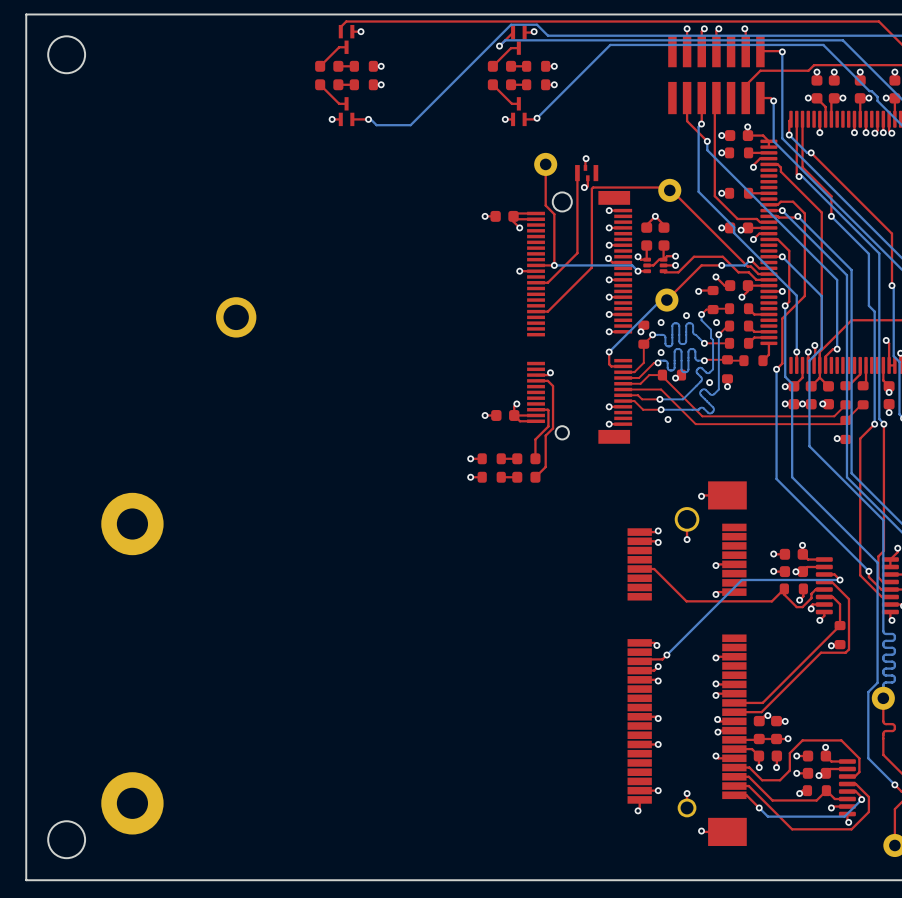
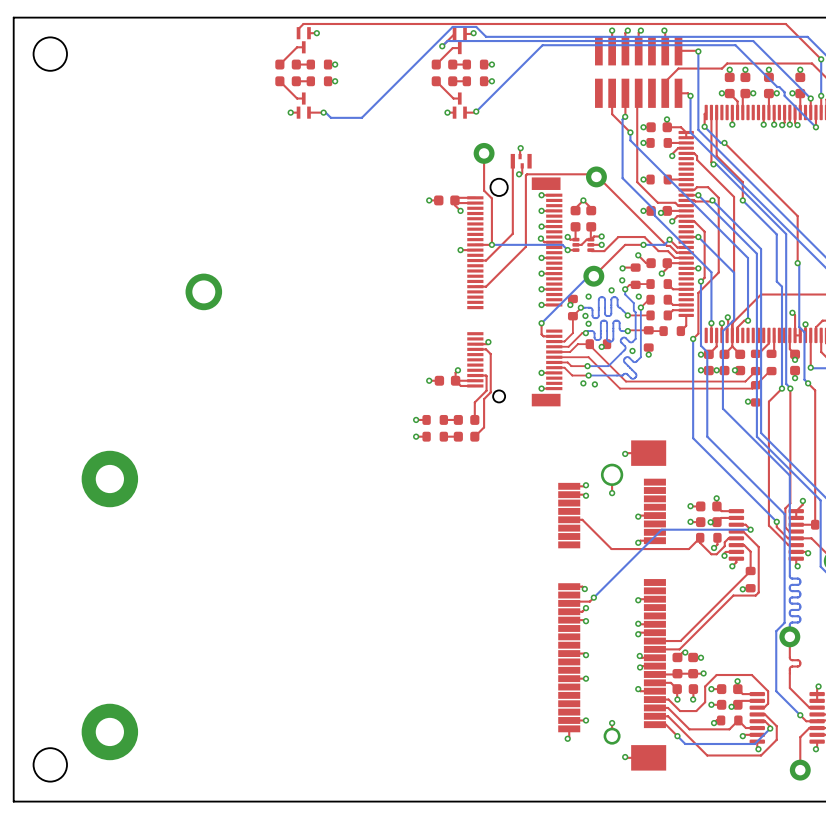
via: none -> (622, 280)
via: none -> (585, 315)
via: none -> (583, 383)

